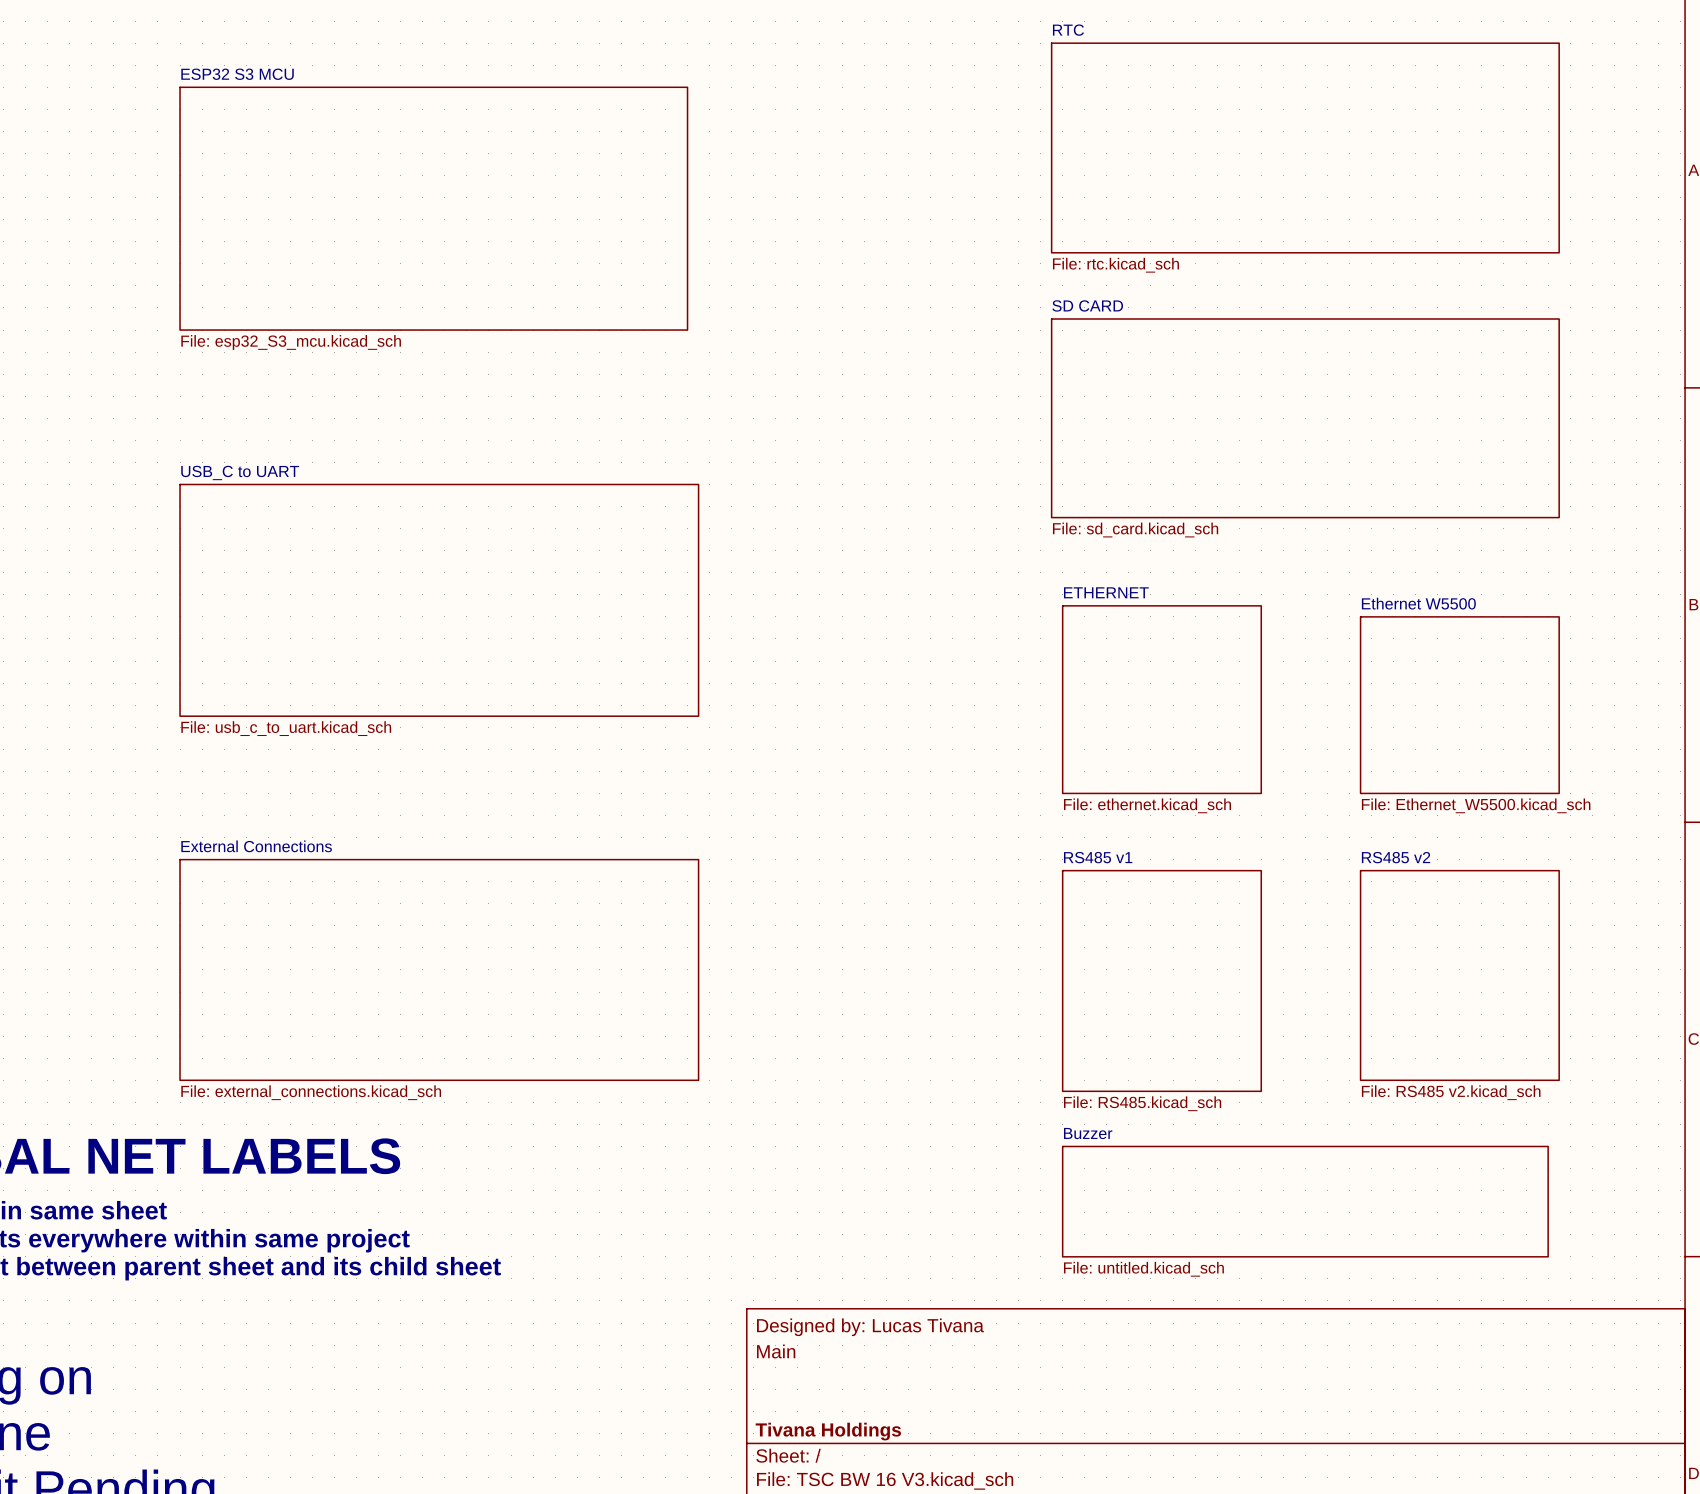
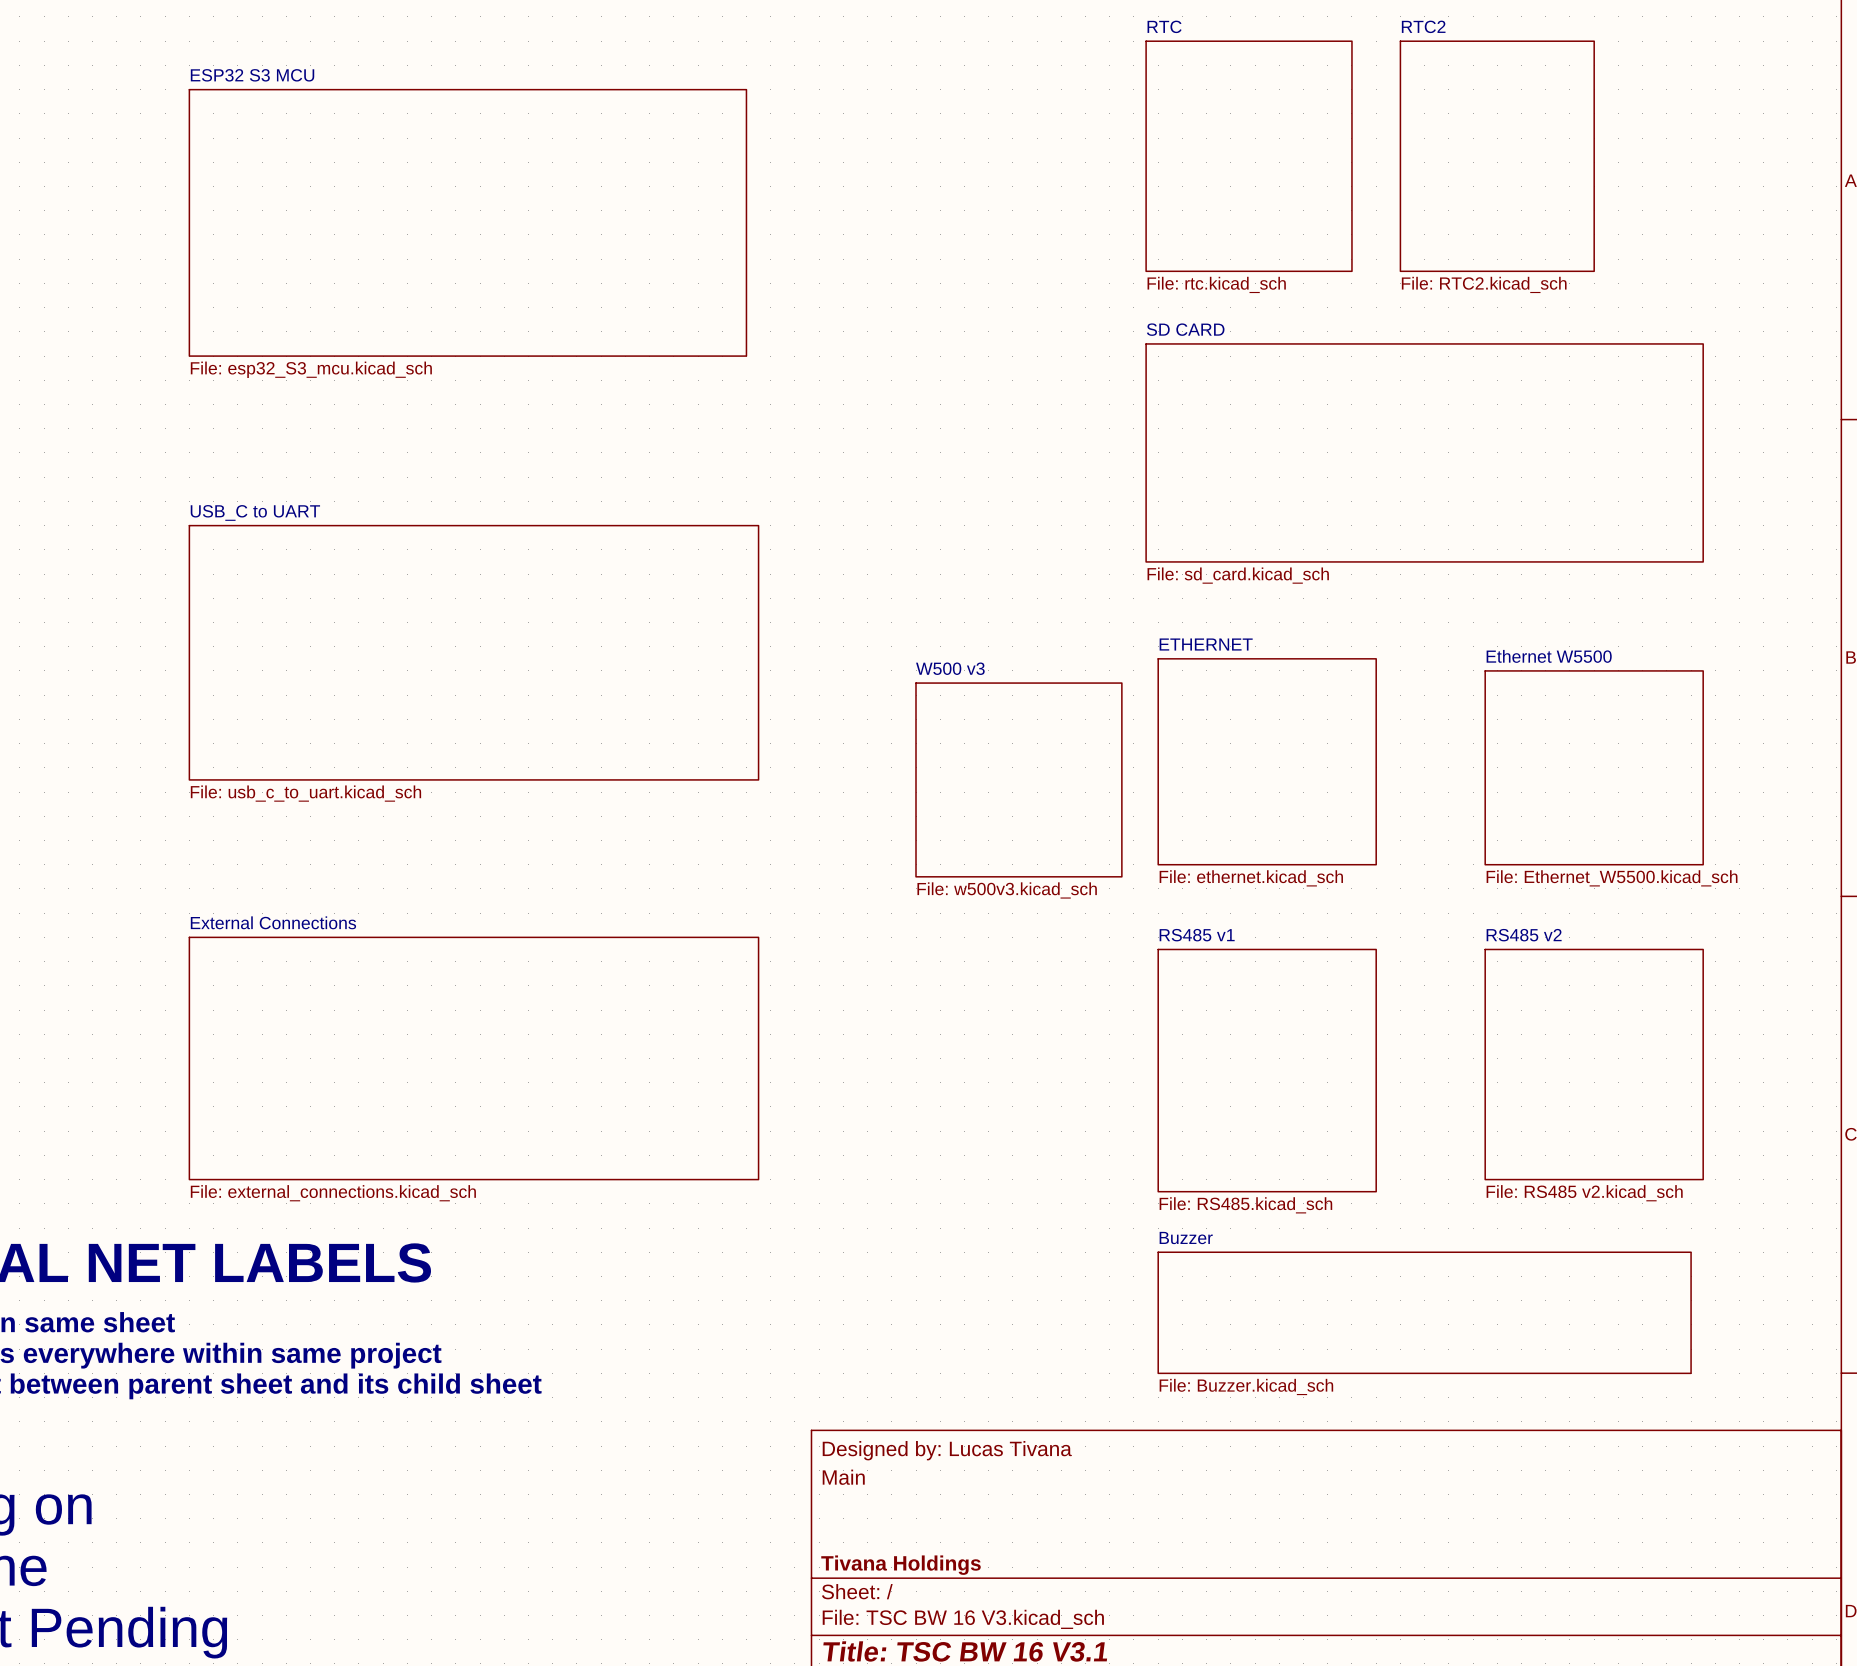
sheet RTC: none -> File: rtc.kicad_sch (1249, 156)
sheet RTC: File: rtc.kicad_sch (1305, 147) -> none
sheet RTC2: none -> File: RTC2.kicad_sch (1497, 156)
sheet W500 v3: none -> File: w500v3.kicad_sch (1018, 779)
sheet Buzzer value: File: untitled.kicad_sch (1143, 1269) -> File: Buzzer.kicad_sch (1246, 1386)

